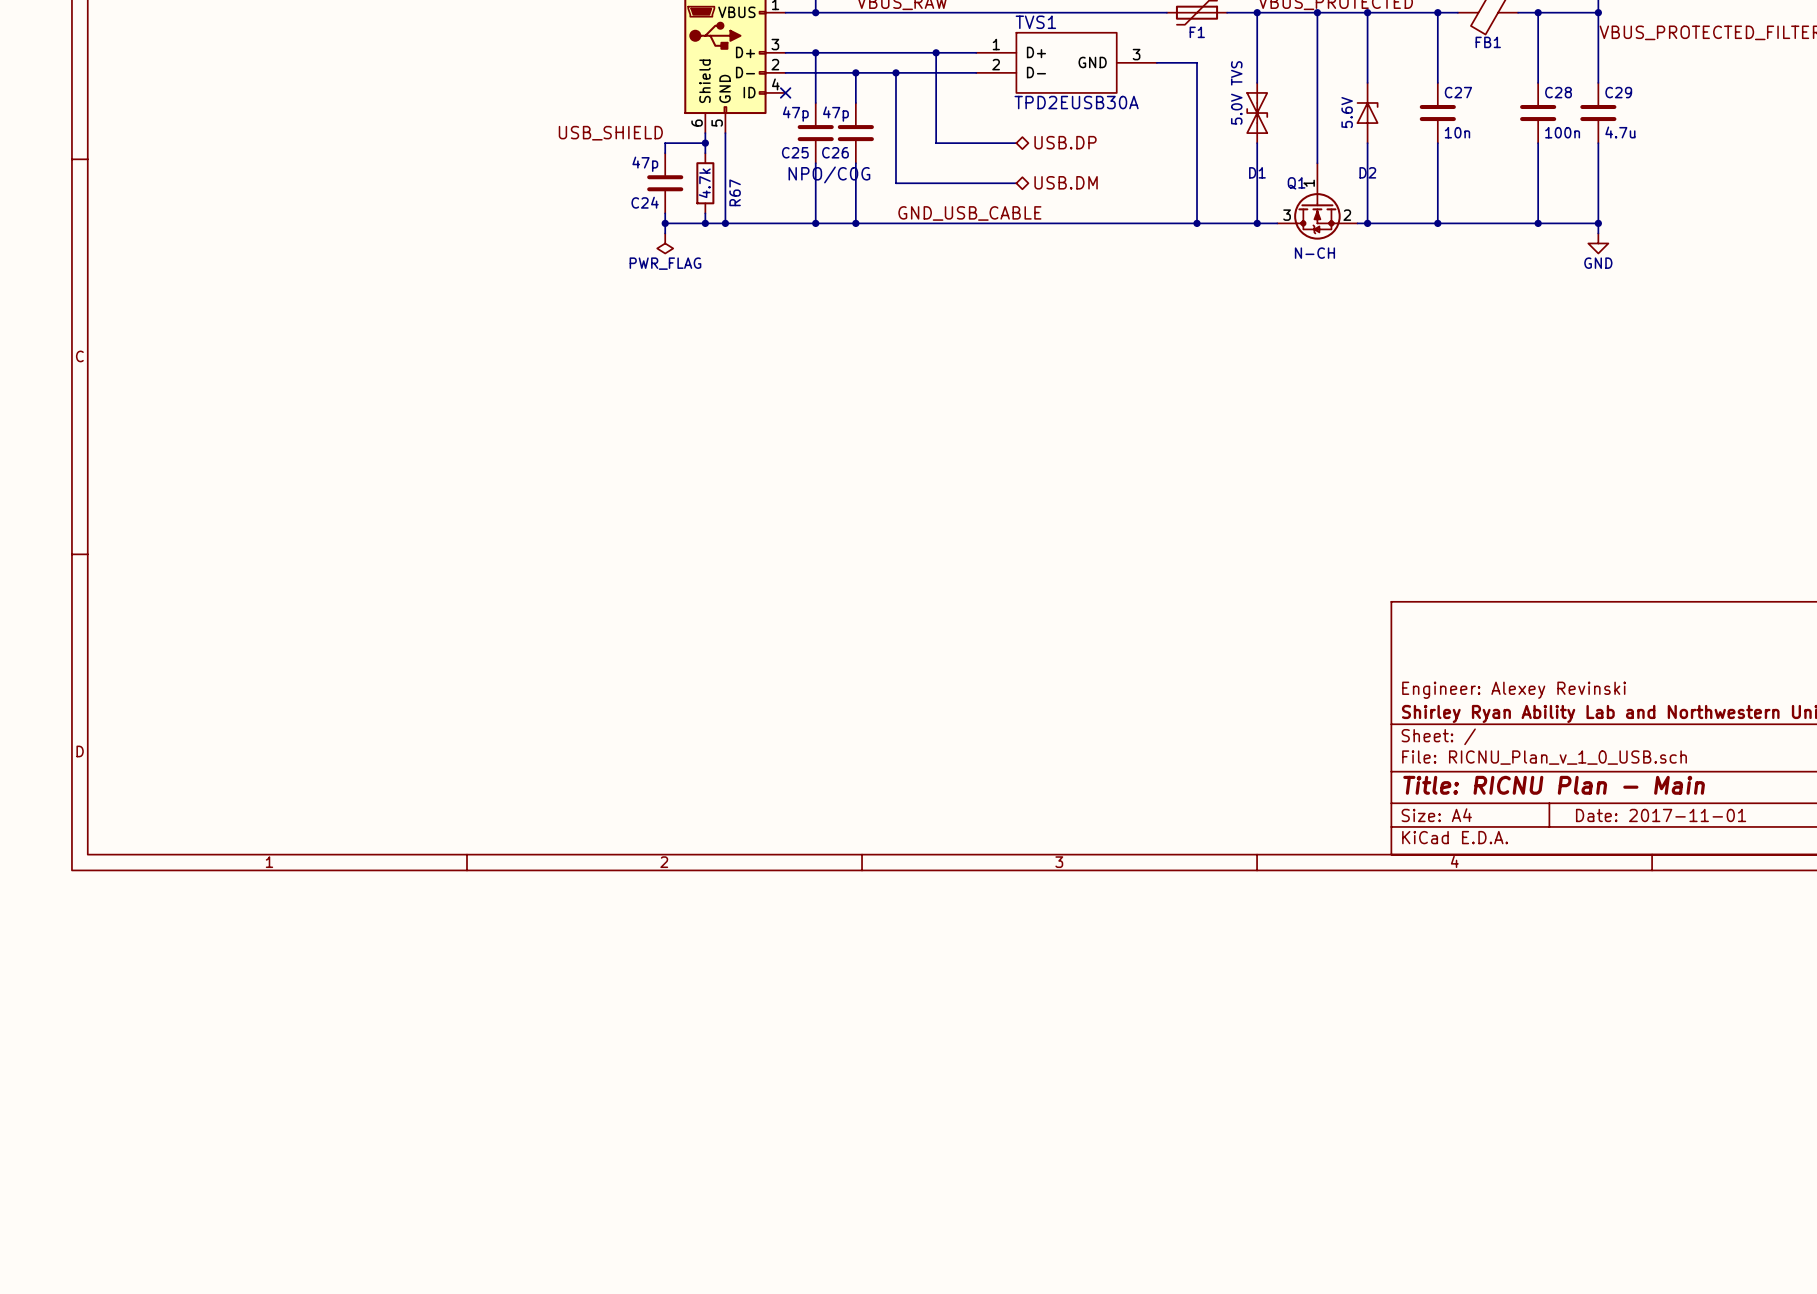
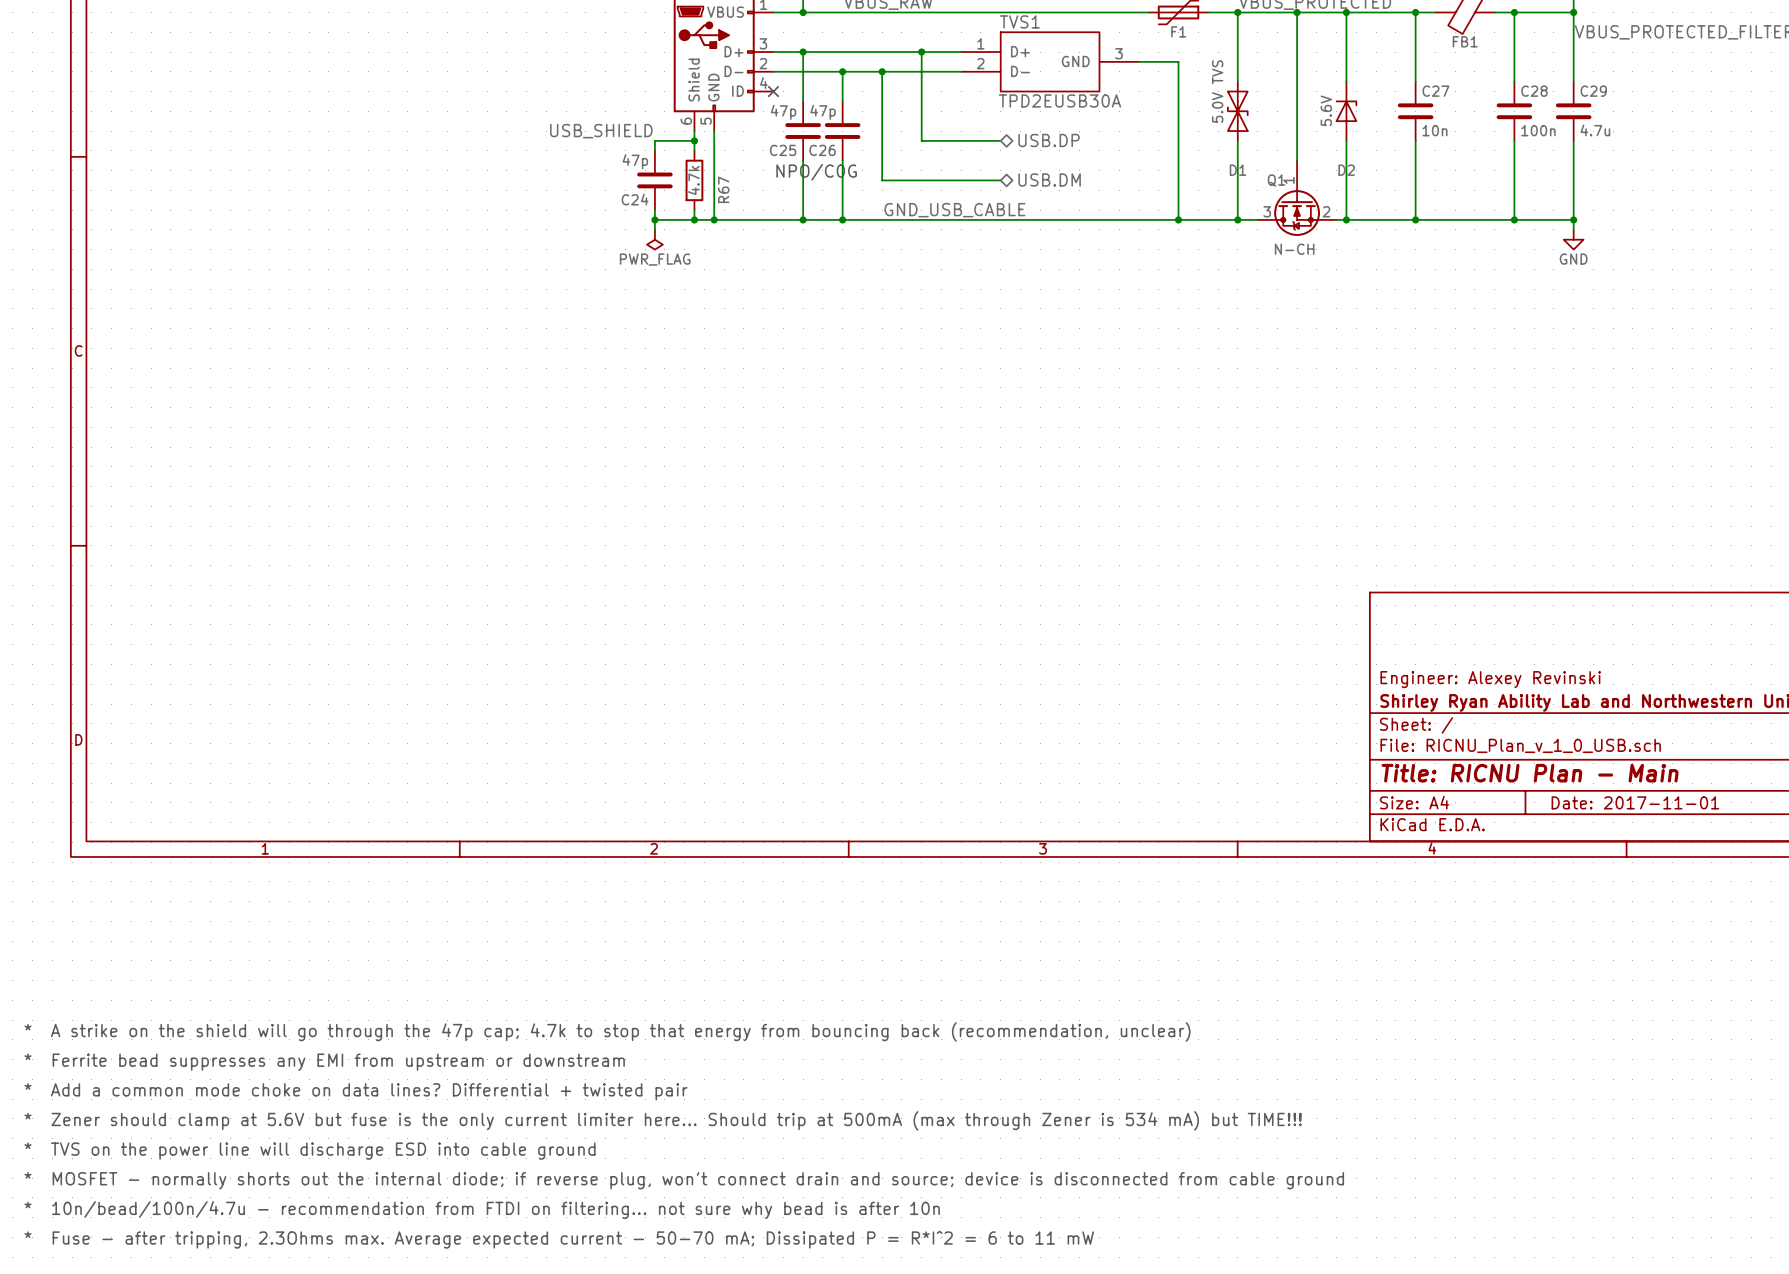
text: none -> * A strike on the shield will go through the 47p cap; 4.7k to stop that energy from bouncing back (recommendation, unclear) (607, 1031)
text: none -> * Ferrite bead suppresses any EMI from upstream or downstream (324, 1062)
text: none -> * Add a common mode choke on data lines? Differential + twisted pair (355, 1091)
text: none -> * Zener should clamp at 5.6V but fuse is the only current limiter here... Should trip at 500mA (max through Zener is 534 mA) but TIME!!! (663, 1120)
text: none -> * TVS on the power line will discharge ESD into cable ground (309, 1151)
text: none -> * MOSFET - normally shorts out the internal diode; if reverse plug, won't connect drain and source; device is disconnected from cable ground (684, 1180)
text: none -> * 10n/bead/100n/4.7u - recommendation from FTDI on filtering... not sure why bead is after 10n (482, 1210)
text: none -> * Fuse - after tripping, 2.3Ohms max. Average expected current - 50-70 mA; Dissipated P = R*I^2 = 6 to 11 mW (559, 1239)

